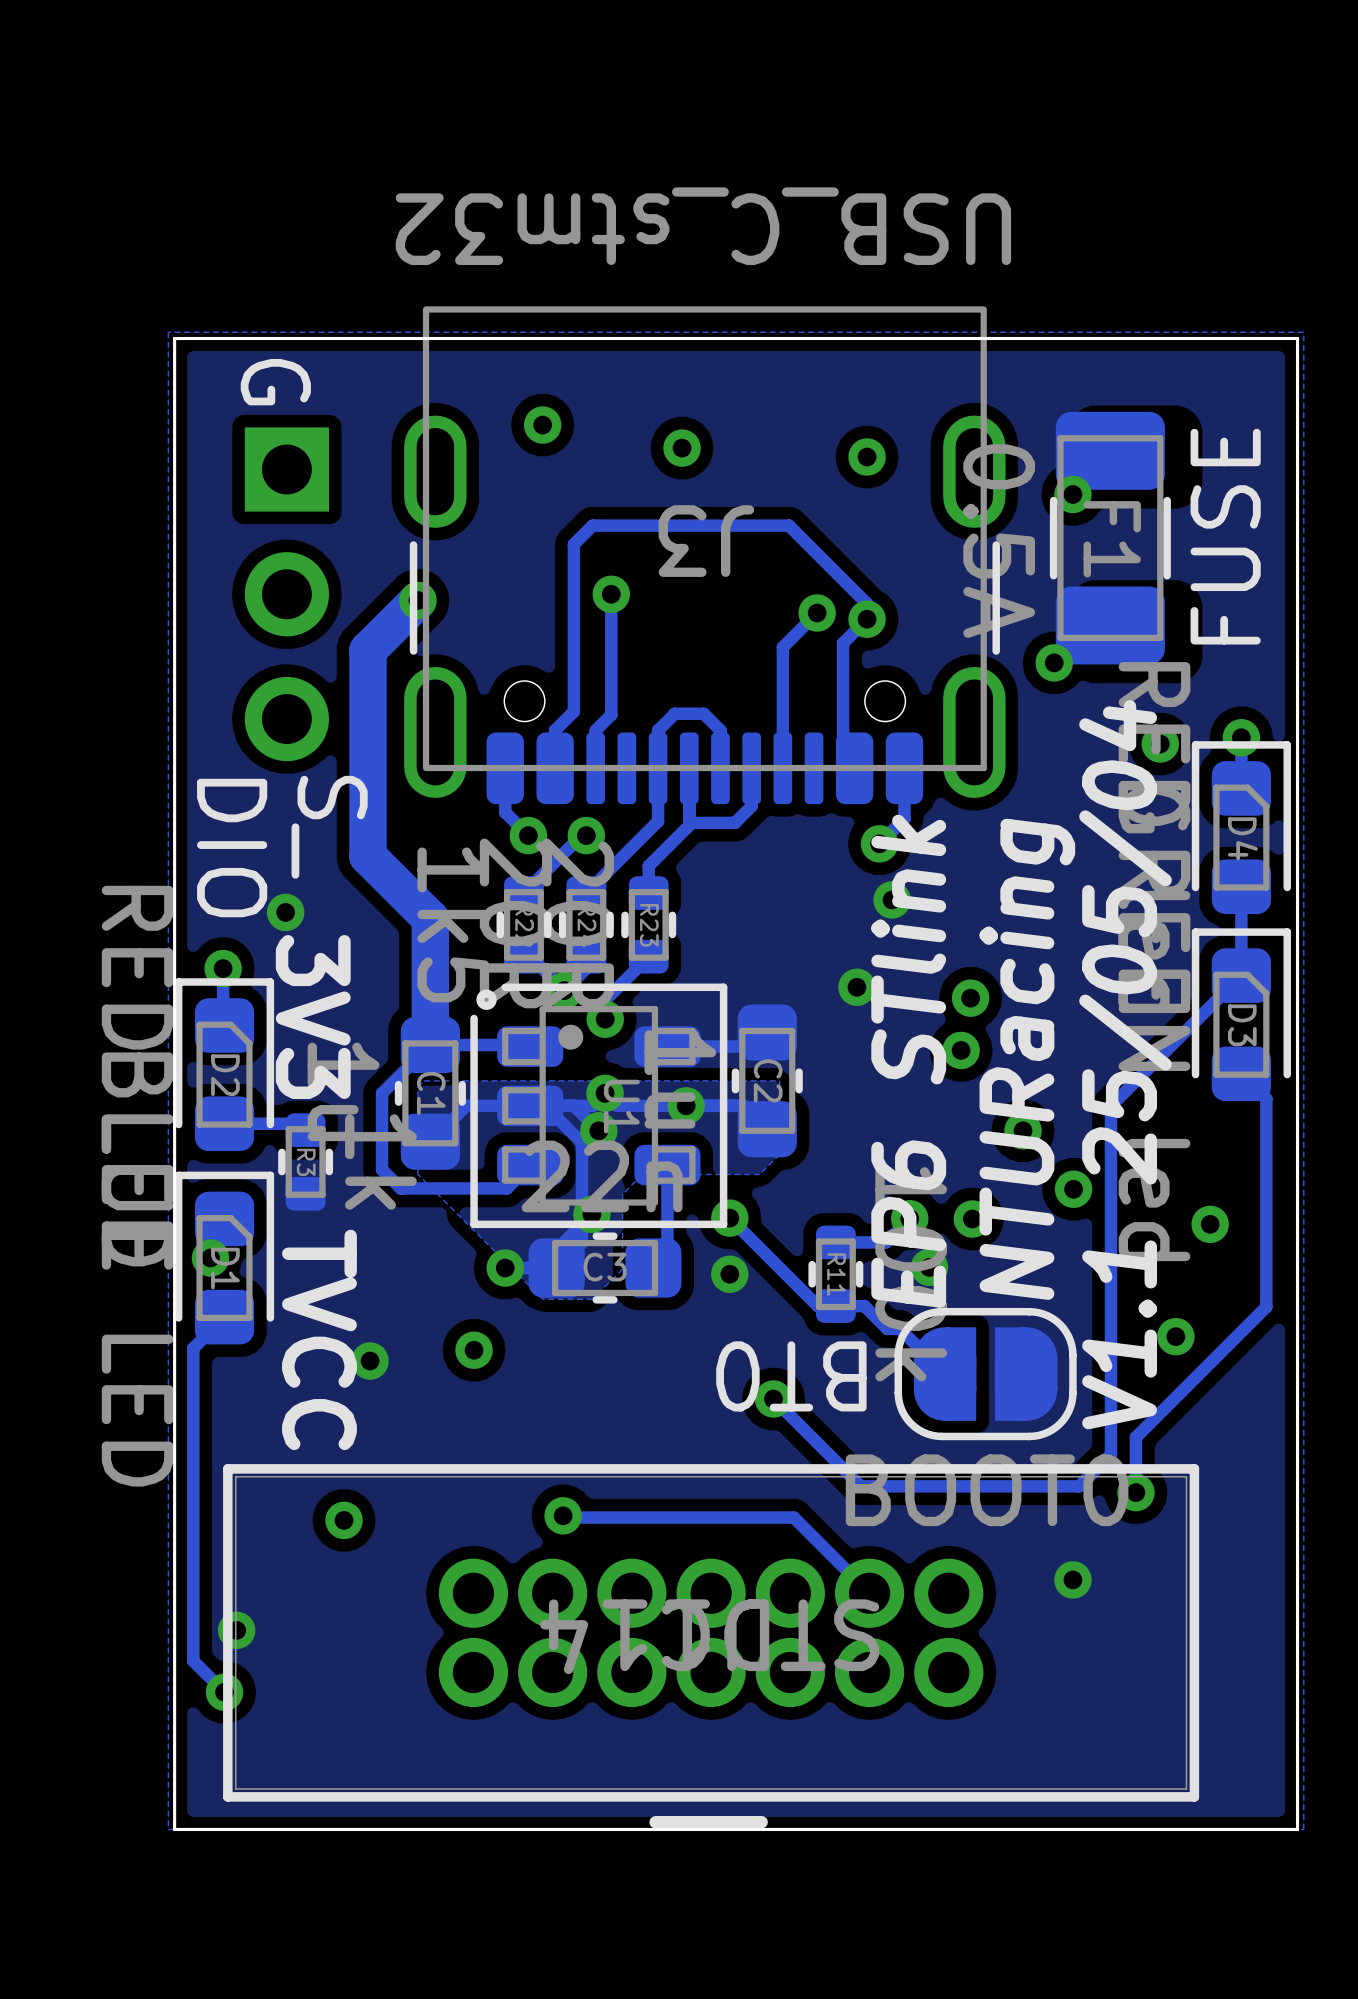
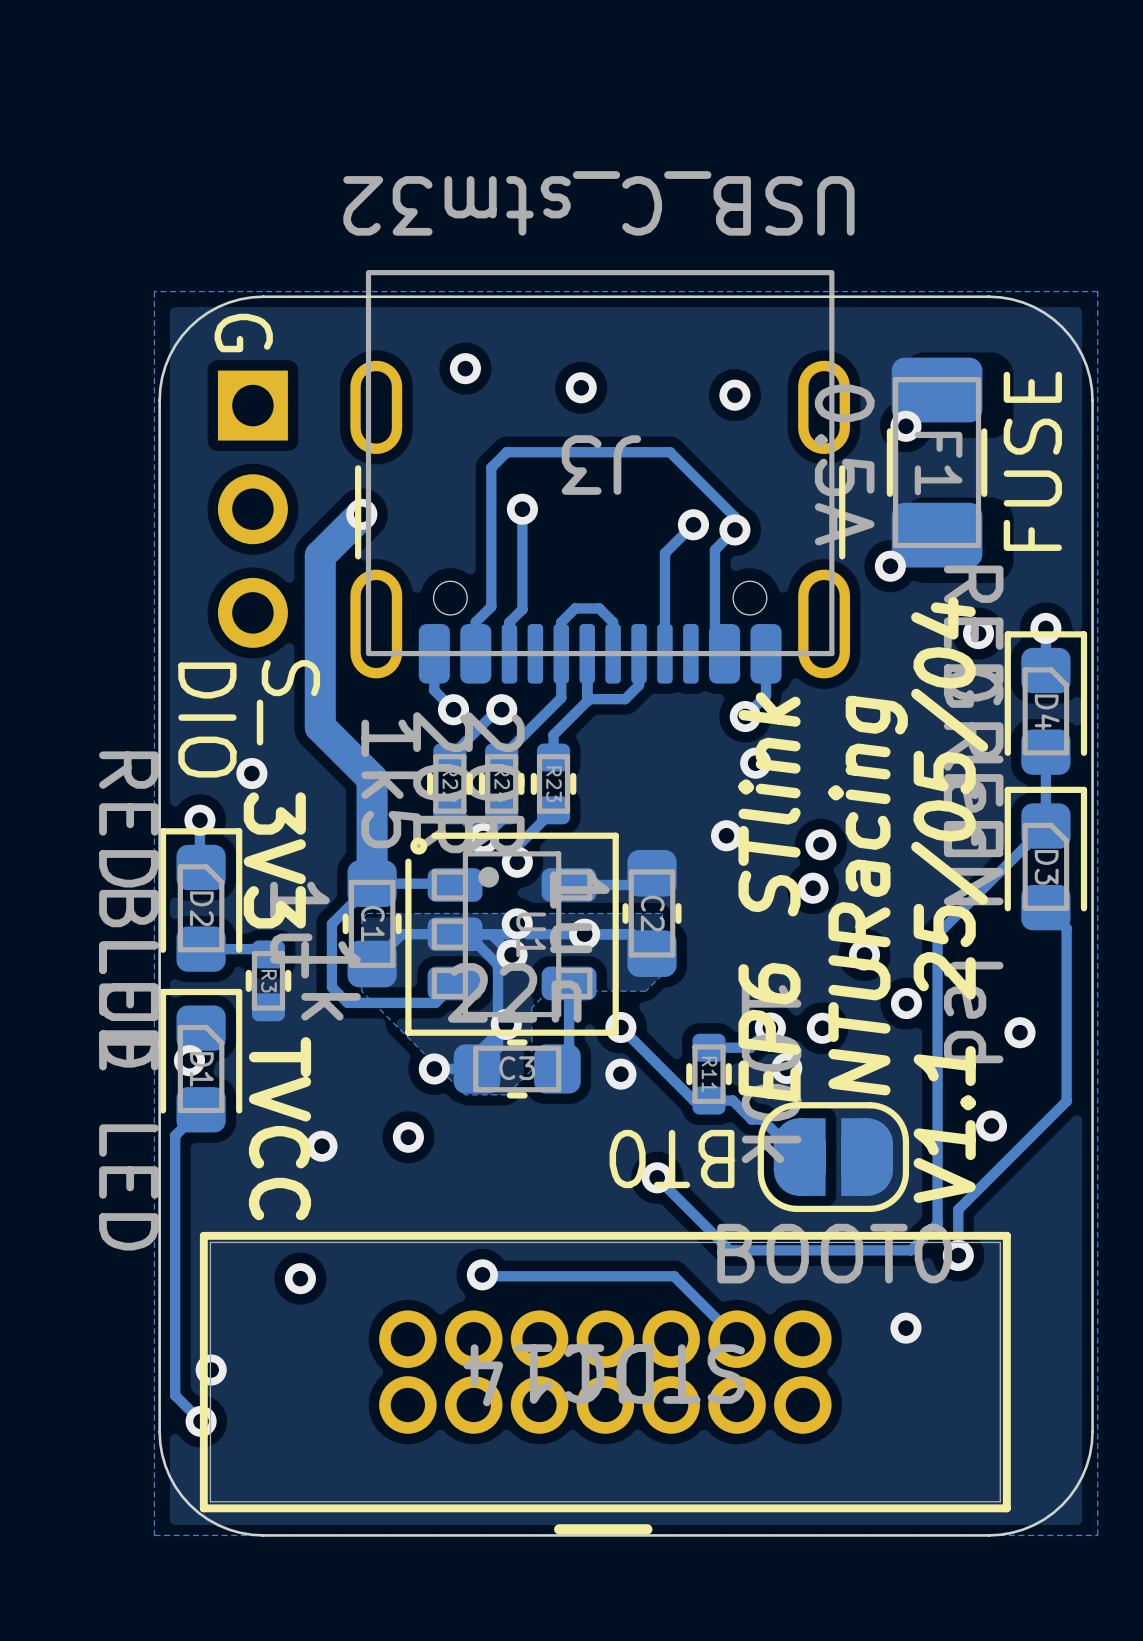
board edge: (299, 338) (174, 338) (174, 463) -> (263, 296) (229, 302) (208, 312) (189, 327) (175, 345) (165, 366) (159, 400)
board edge: (1172, 338) (1297, 338) (1297, 463) -> (988, 296) (1011, 299) (1033, 306) (1062, 327) (1082, 355) (1089, 377) (1092, 400)
board edge: (174, 1704) (174, 1829) (299, 1829) -> (159, 1431) (162, 1454) (169, 1476) (189, 1505) (218, 1525) (240, 1532) (263, 1535)
board edge: (1297, 1704) (1297, 1829) (1172, 1829) -> (1092, 1431) (1089, 1454) (1082, 1476) (1062, 1505) (1044, 1519) (1023, 1529) (988, 1535)

